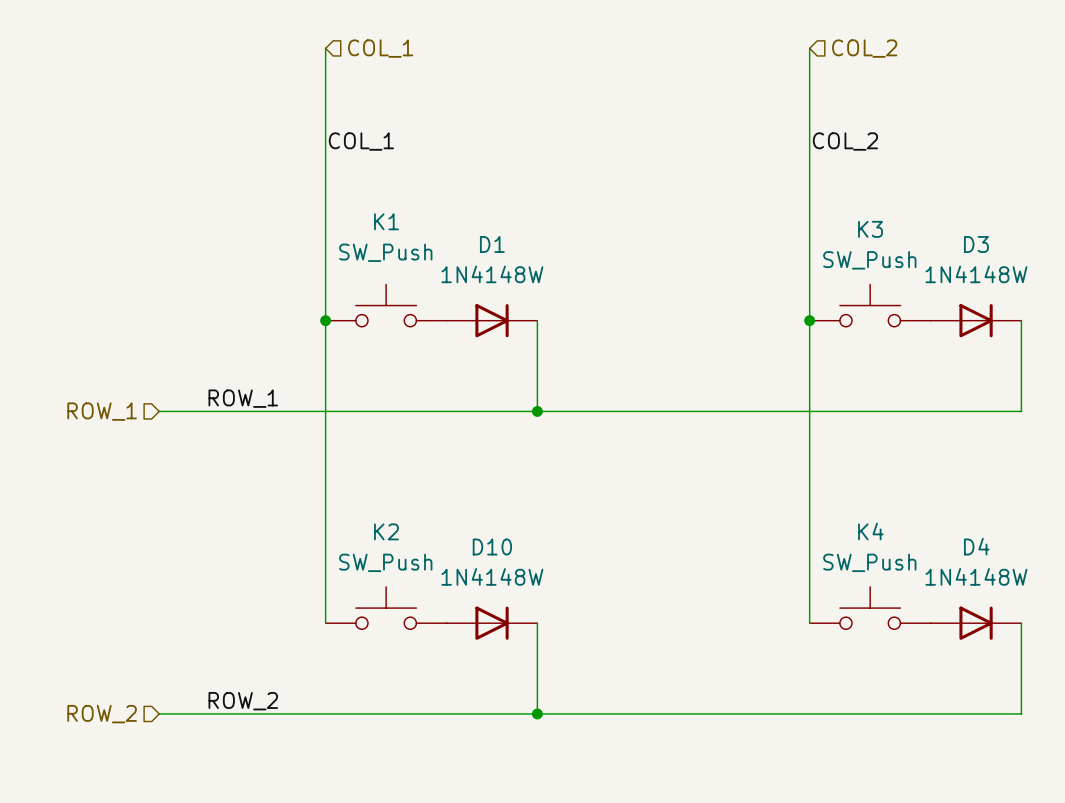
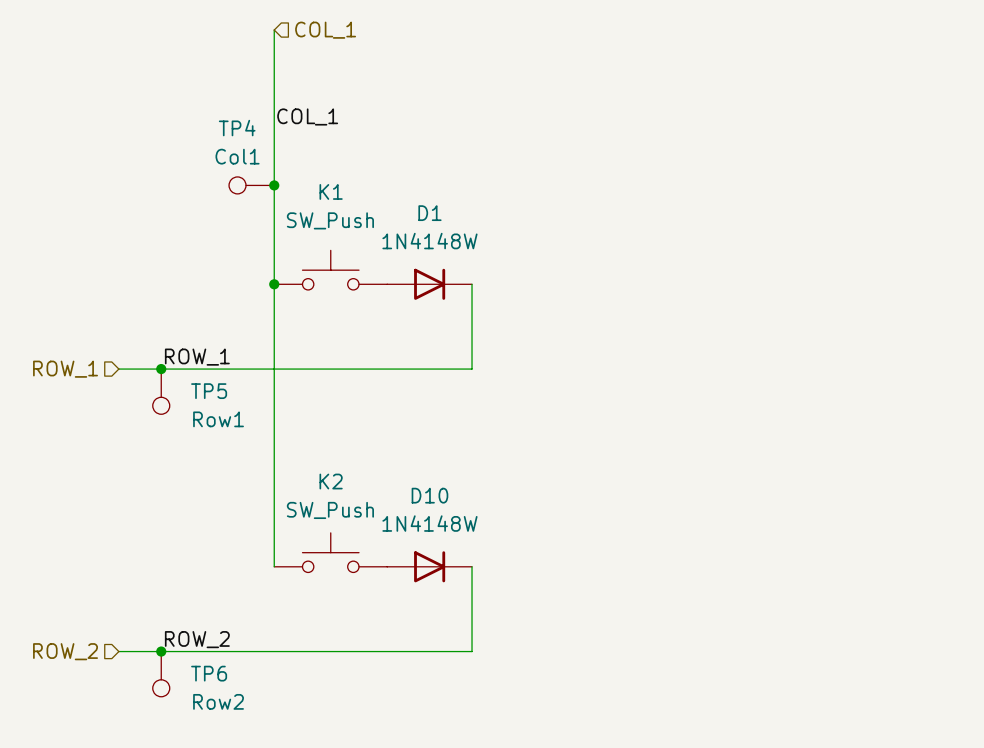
wire: (809, 48) (809, 623) -> none
hierarchical label: COL_2 (864, 48) -> none
label: COL_2 (845, 141) -> none
TP4: none -> Col1 (251, 185)
junction: none -> (274, 185)
K3: SW_Push (870, 305) -> none
junction: (809, 320) -> none
D3: 1N4148W (976, 320) -> none
wire: (1021, 320) (1021, 411) (537, 411) -> none
junction: none -> (161, 369)
junction: (537, 411) -> none
TP5: none -> Row1 (161, 391)
K4: SW_Push (870, 608) -> none
D4: 1N4148W (976, 623) -> none
wire: (1021, 623) (1021, 713) (537, 713) -> none
junction: none -> (161, 651)
junction: (537, 713) -> none
TP6: none -> Row2 (161, 674)

